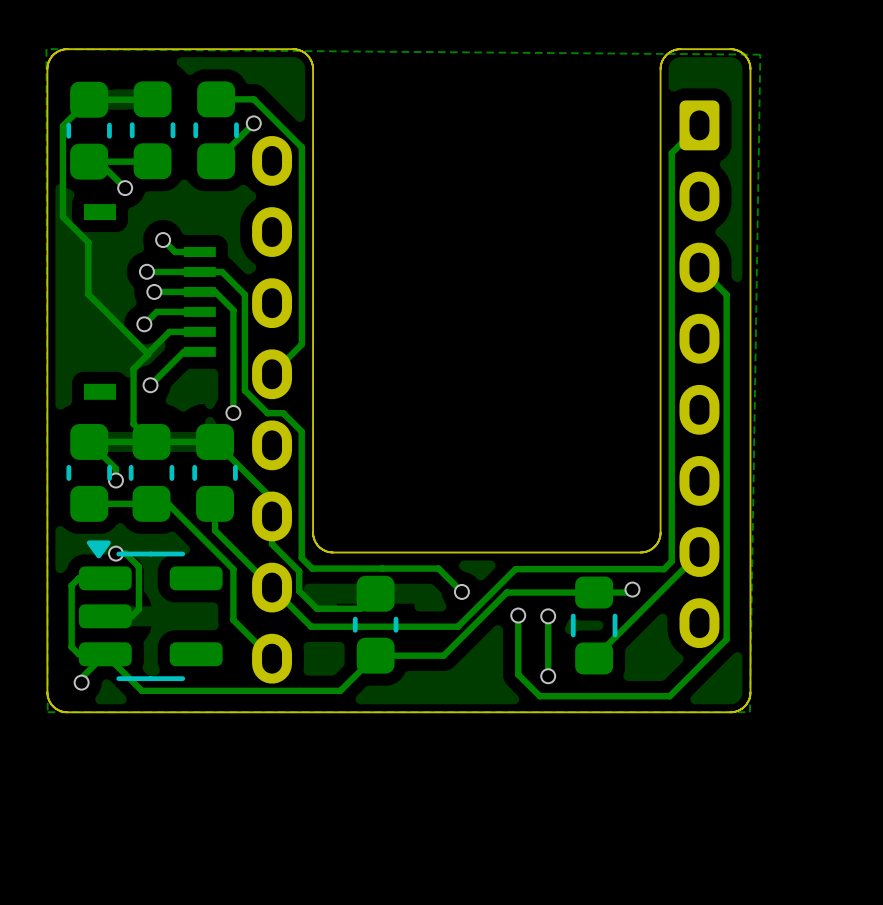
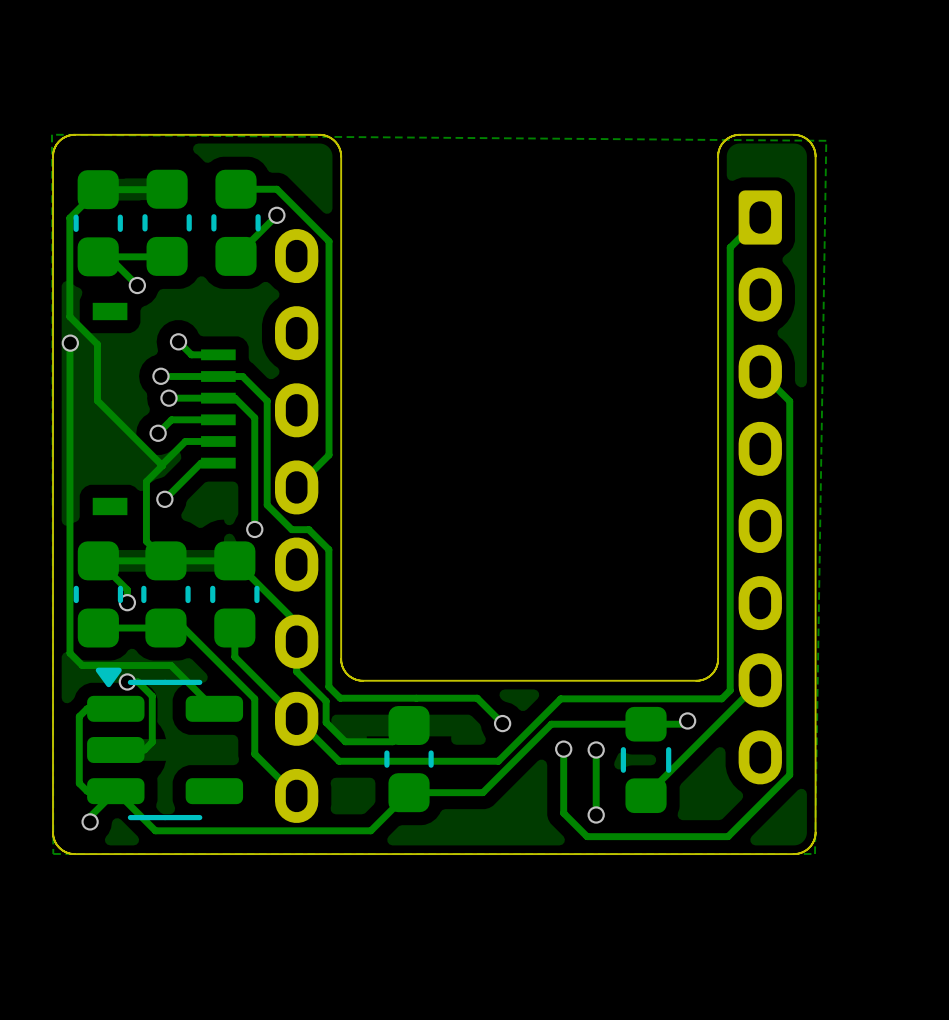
track: none -> (69, 343) (69, 653) (82, 665) (171, 665) (214, 708)
via: none -> (70, 343)

